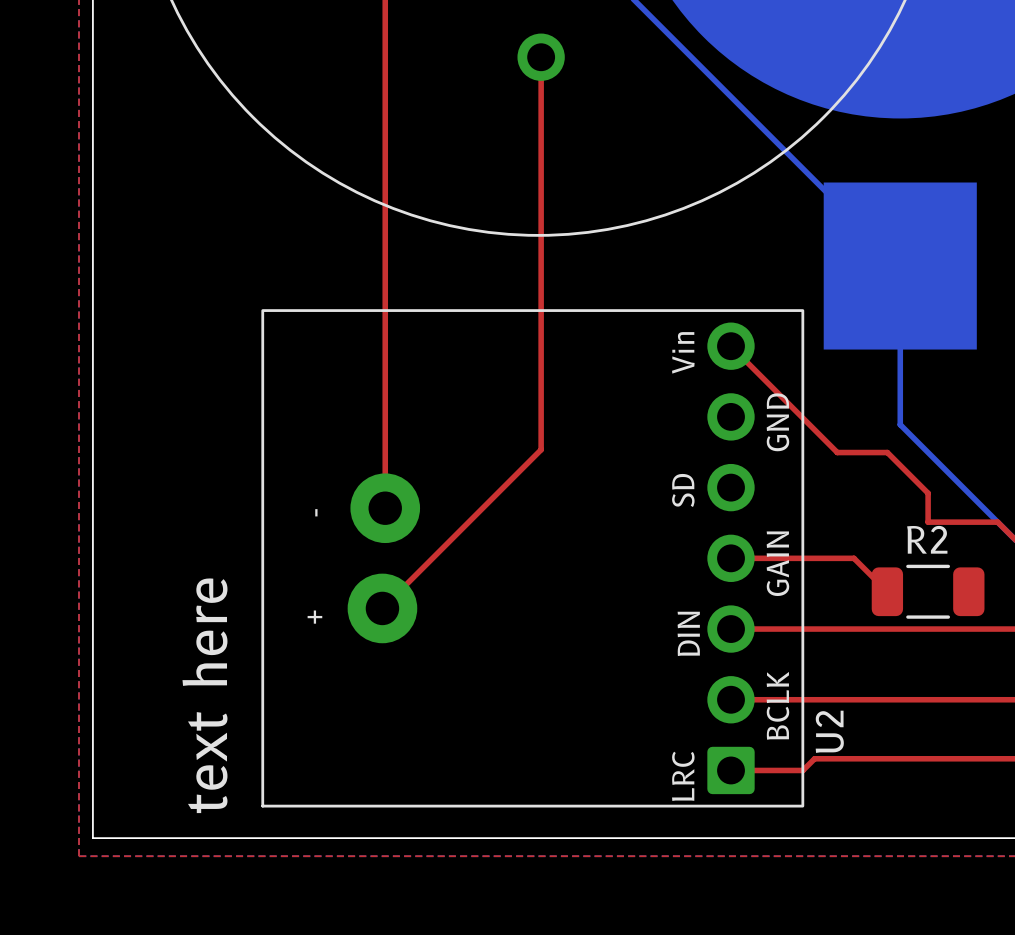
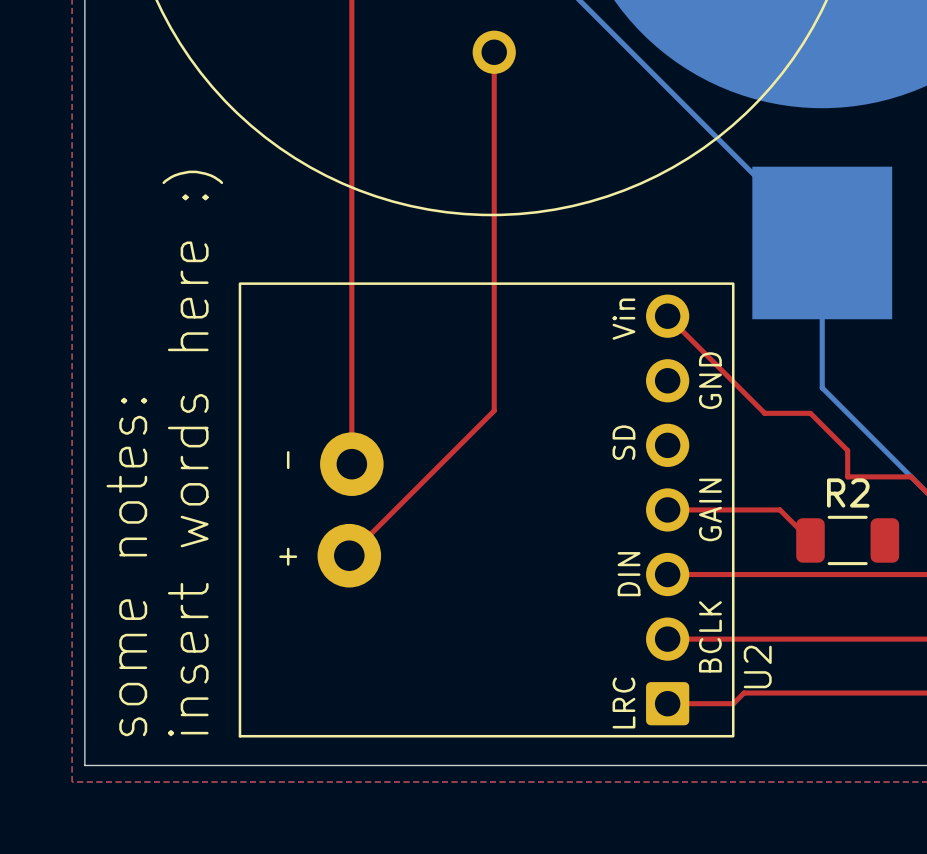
text: none -> some notes: (126, 566)
text: text here (204, 695) -> insert words here :) (192, 453)

